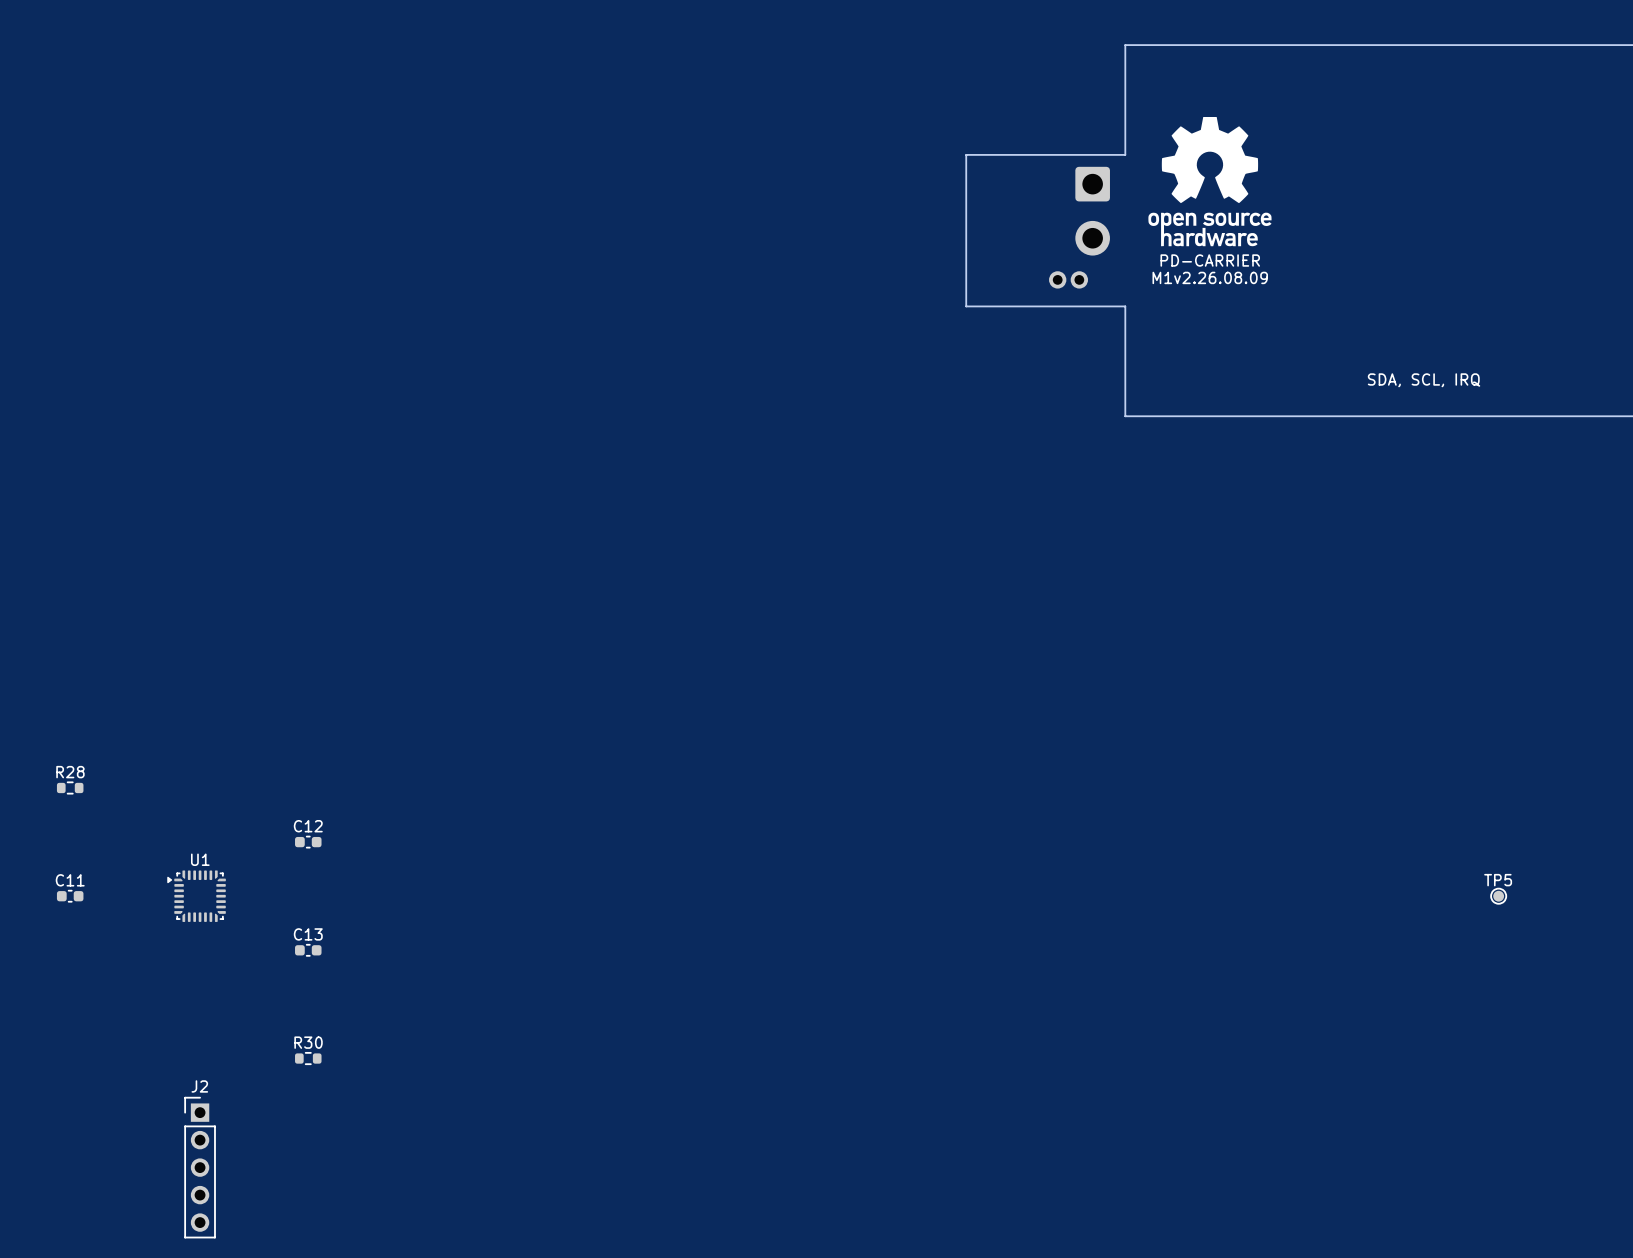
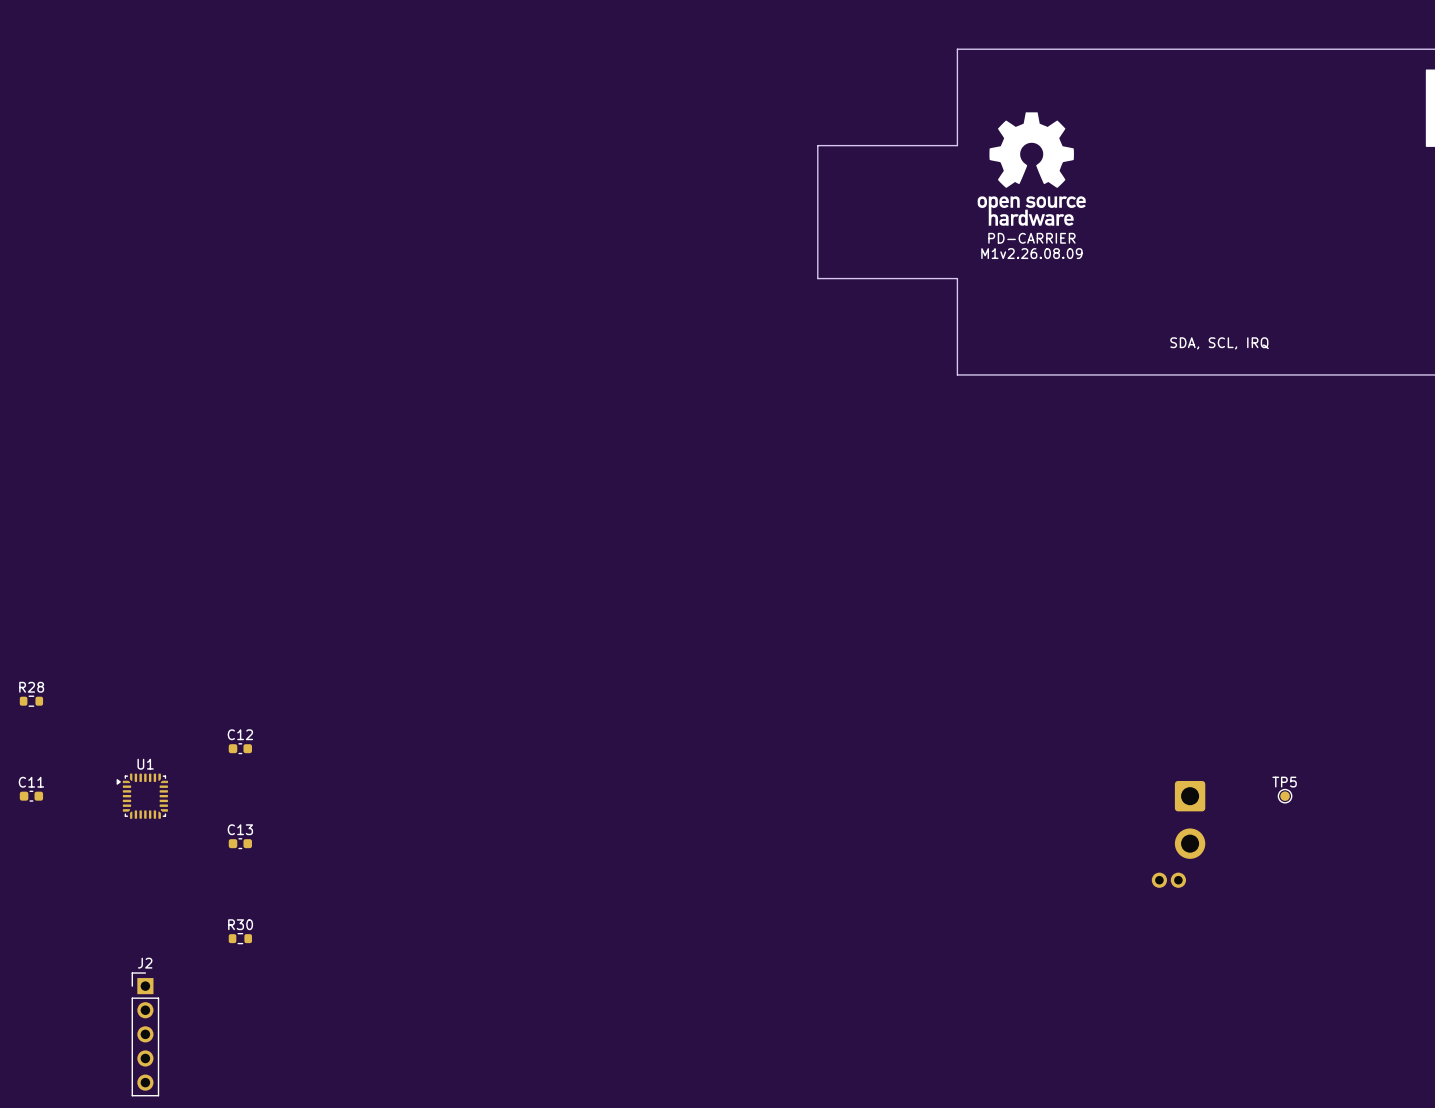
part: (1079, 227) -> none
part: none -> (1178, 834)

